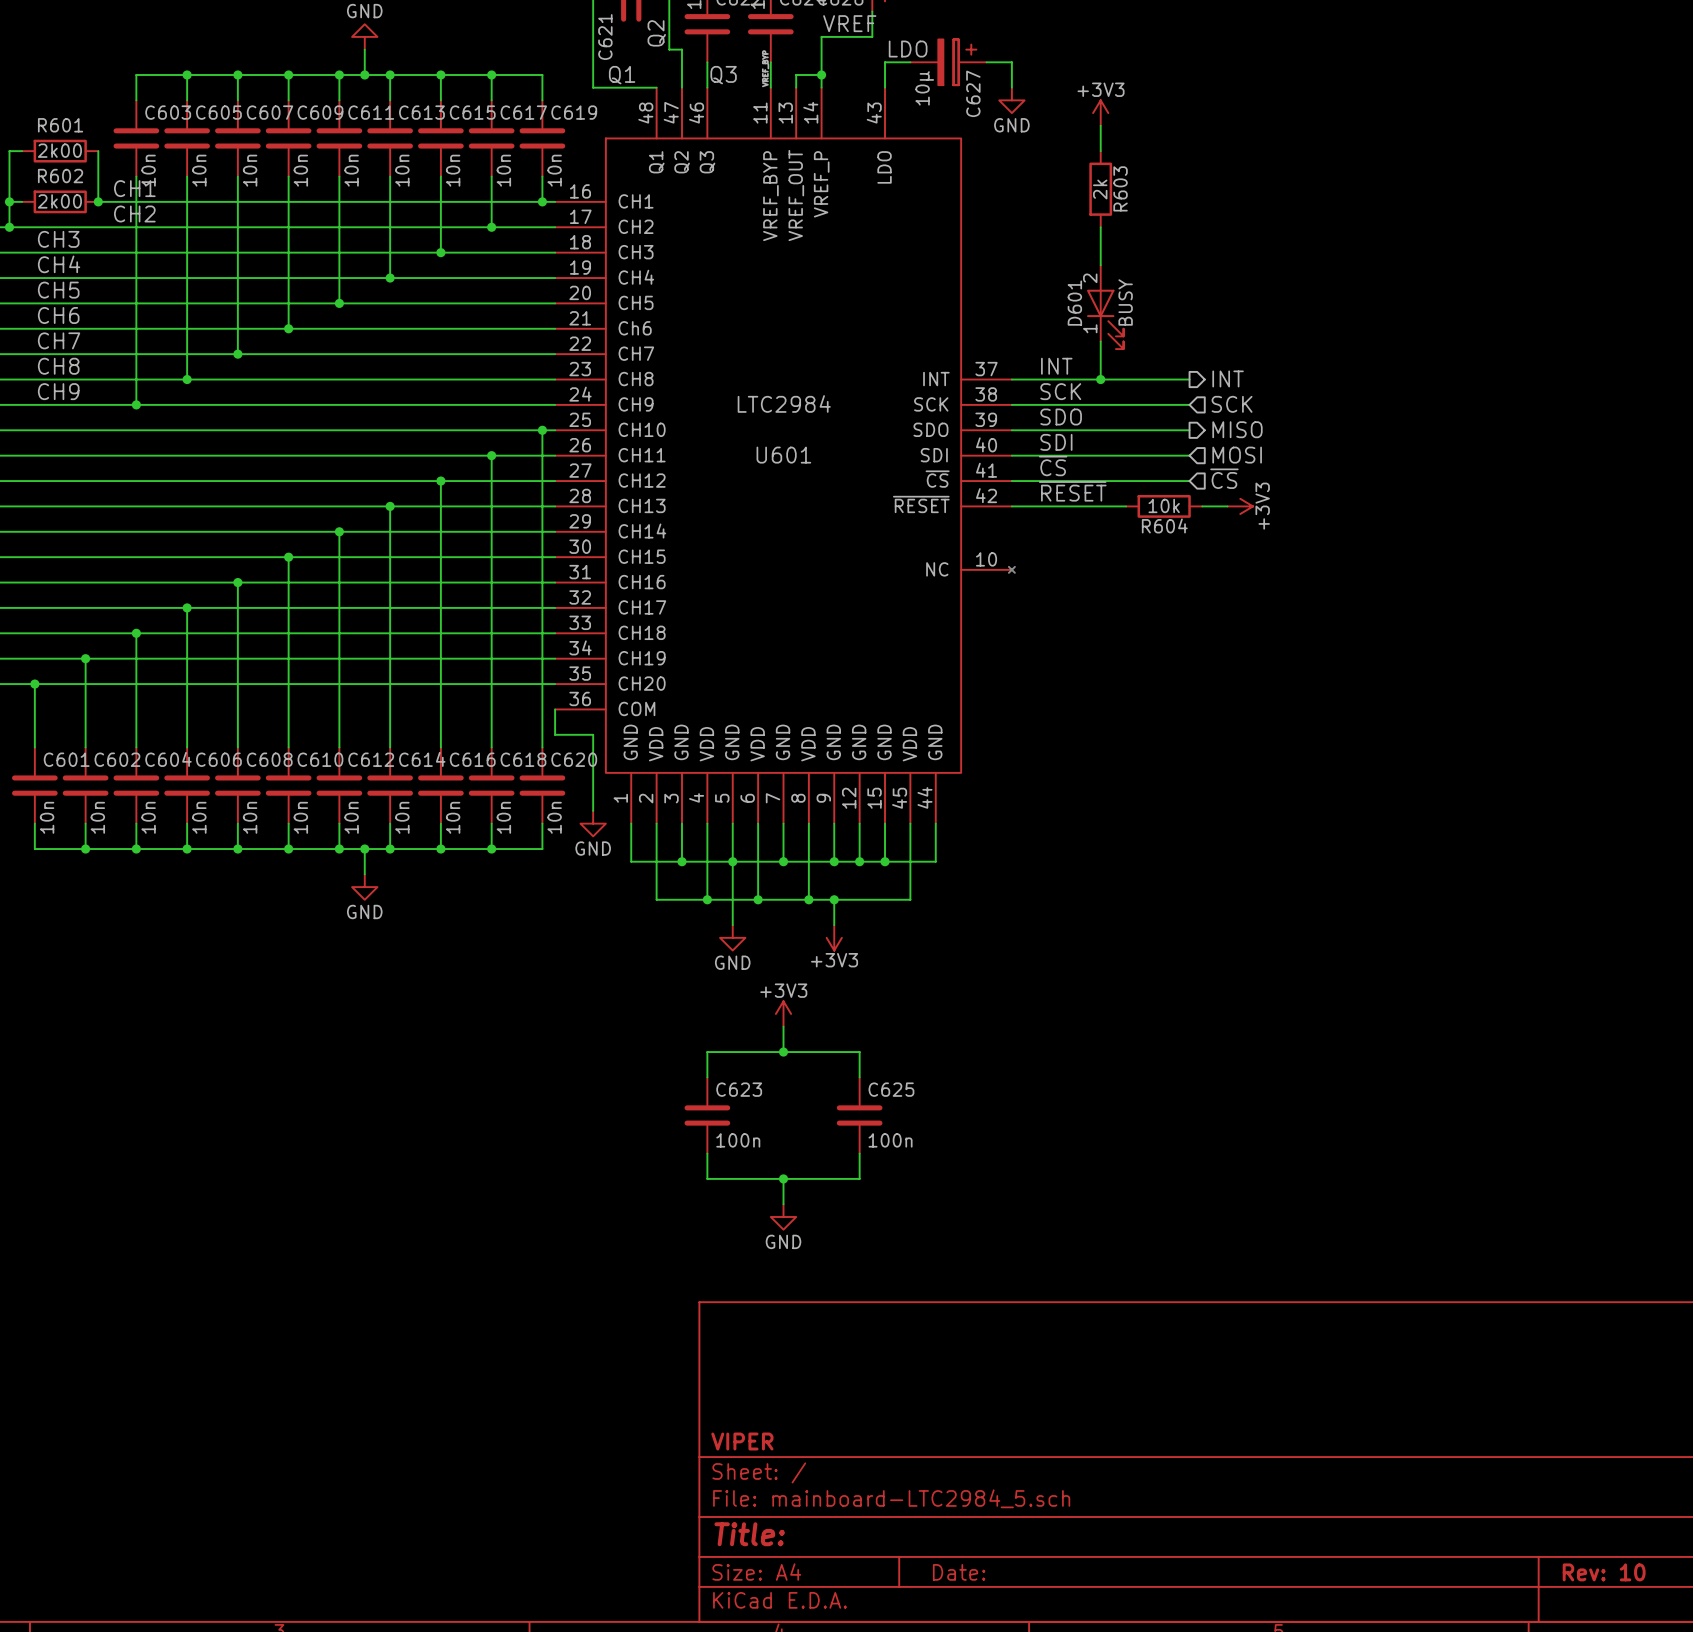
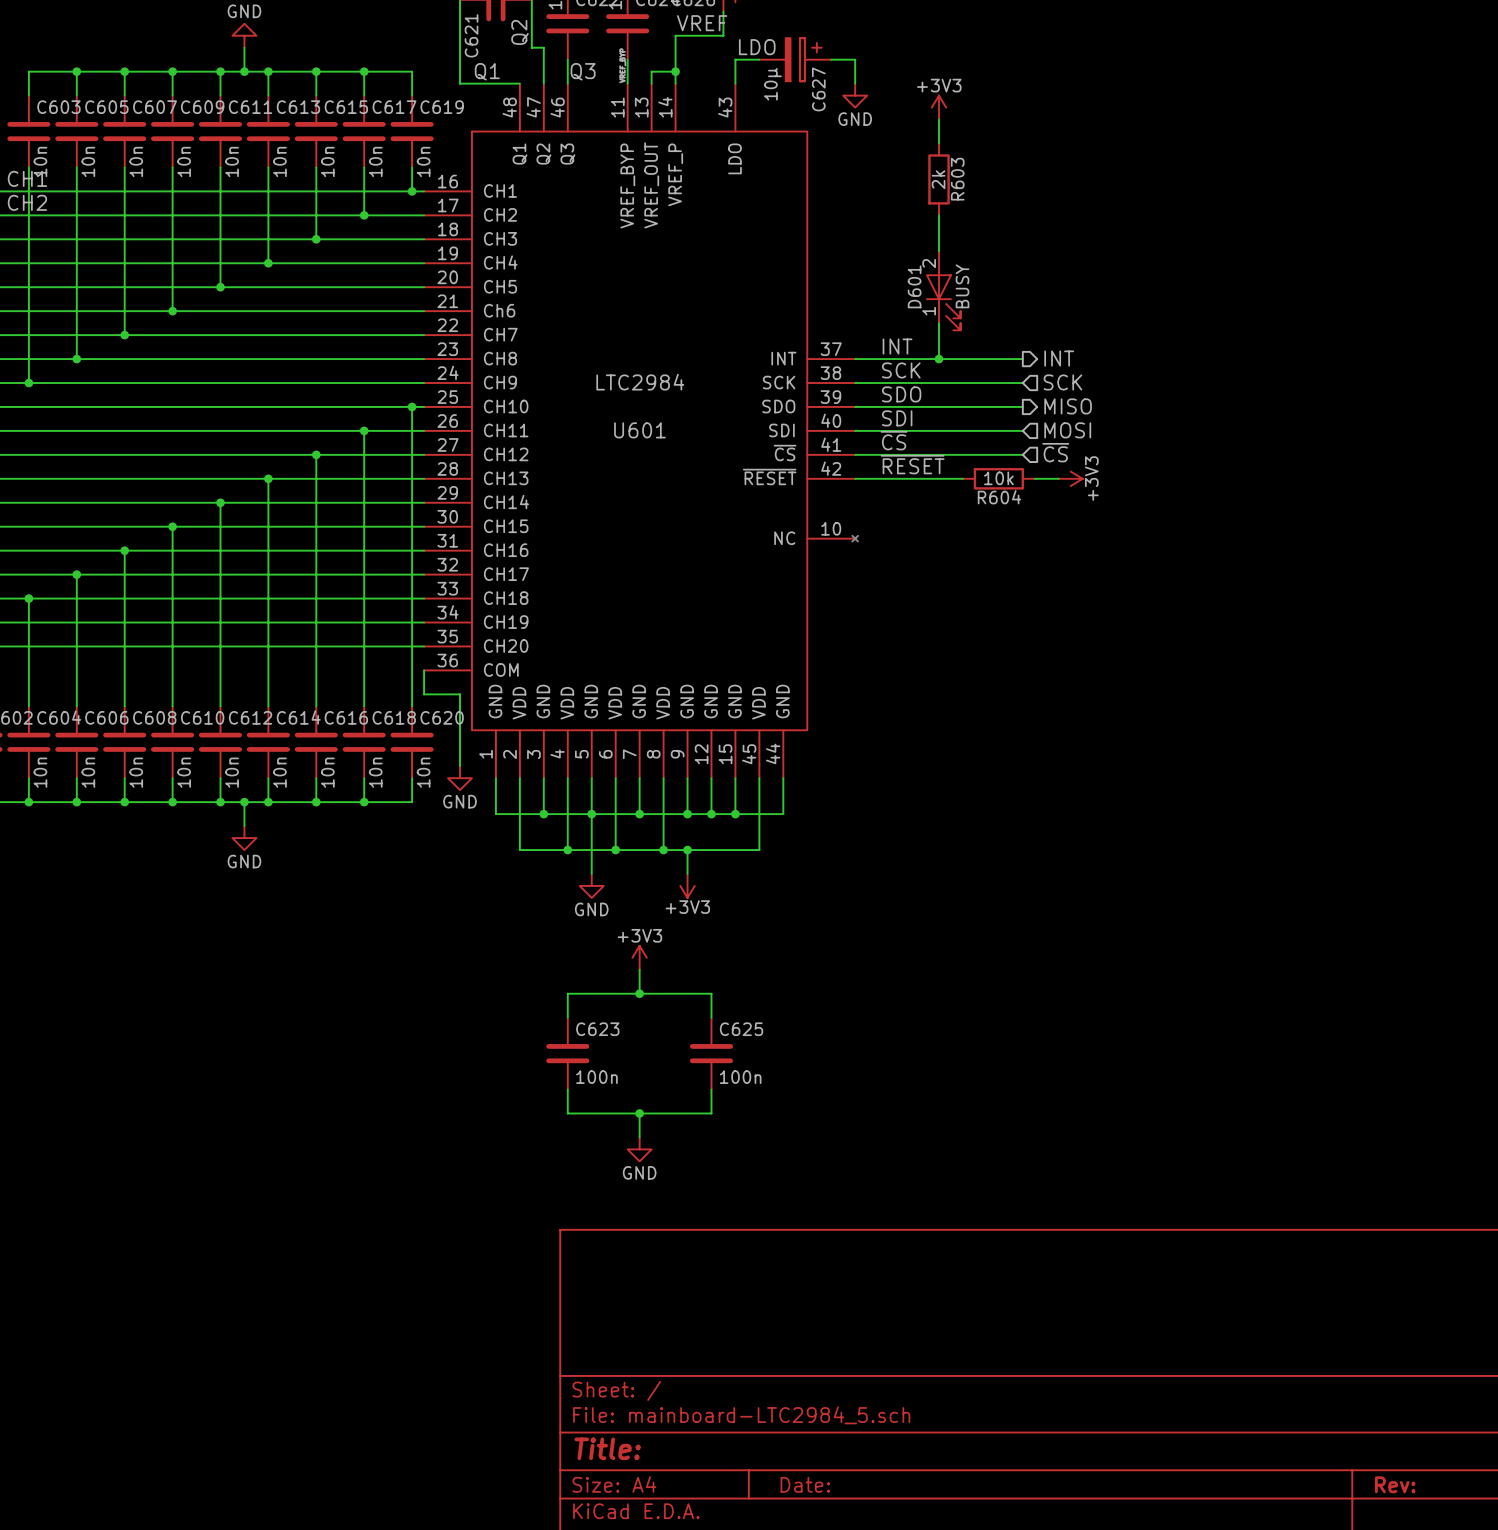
title block: VIPER (742, 1441) -> none
title block: Rev: 10 (1604, 1572) -> Rev: (1395, 1484)

